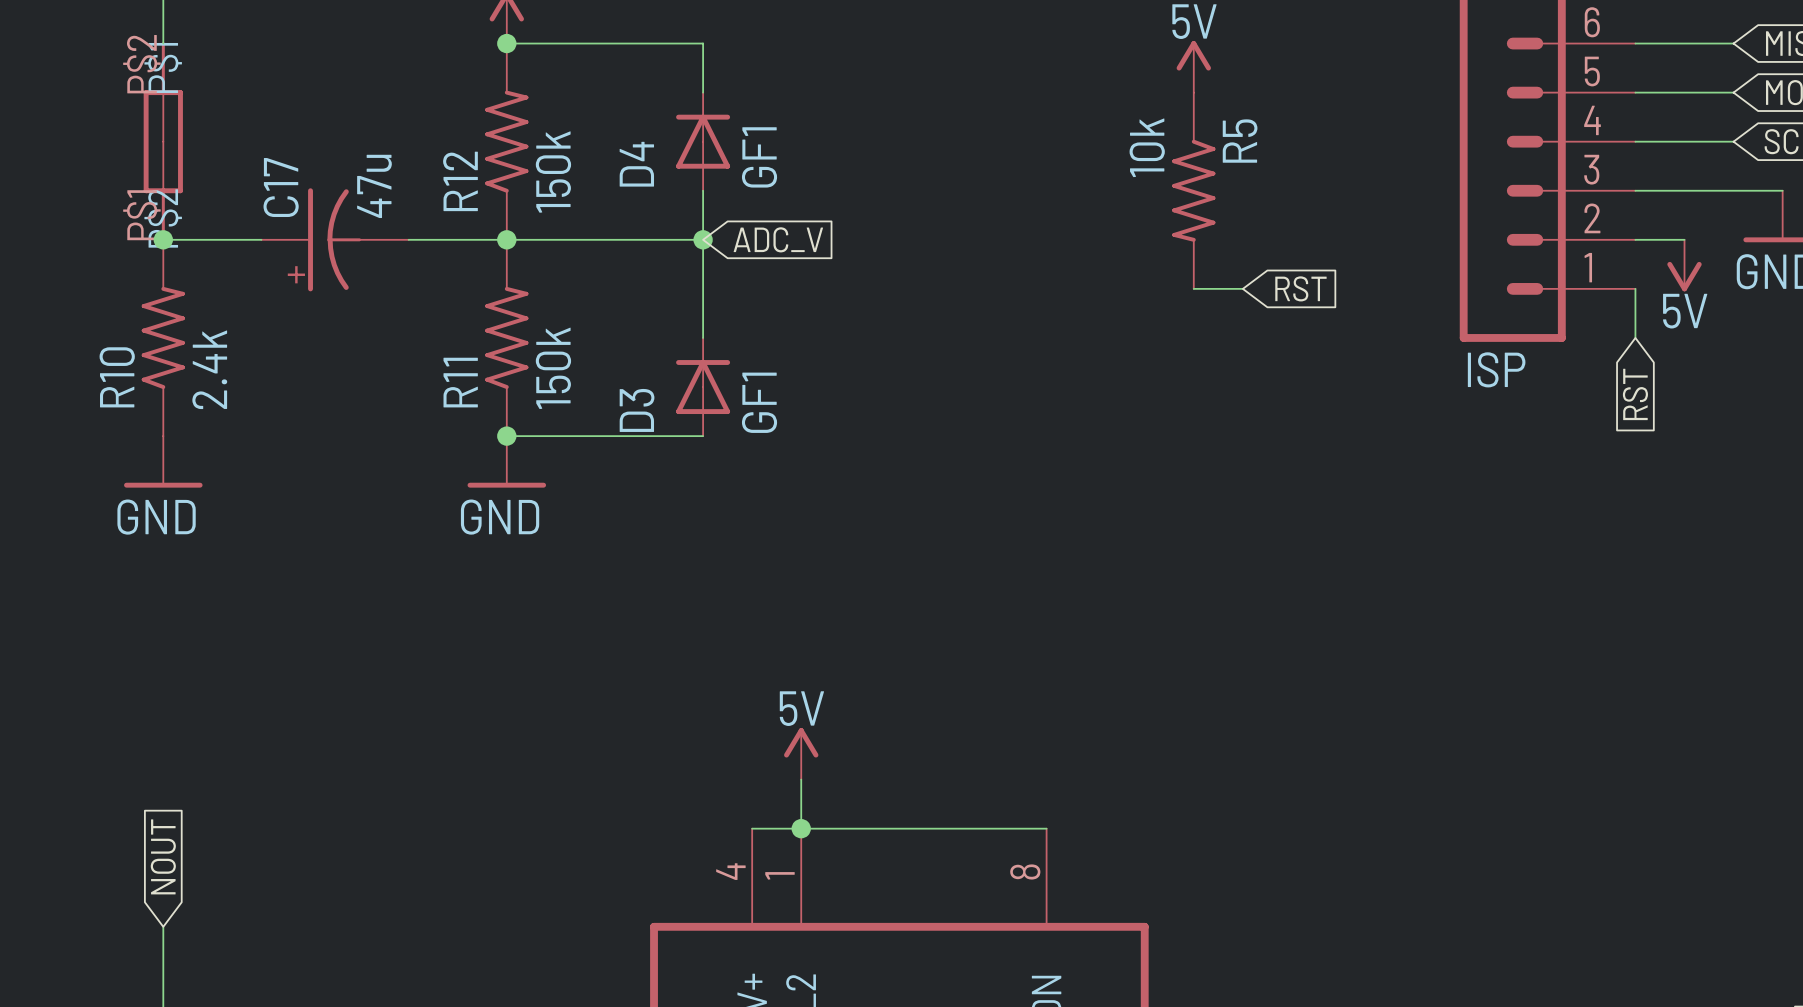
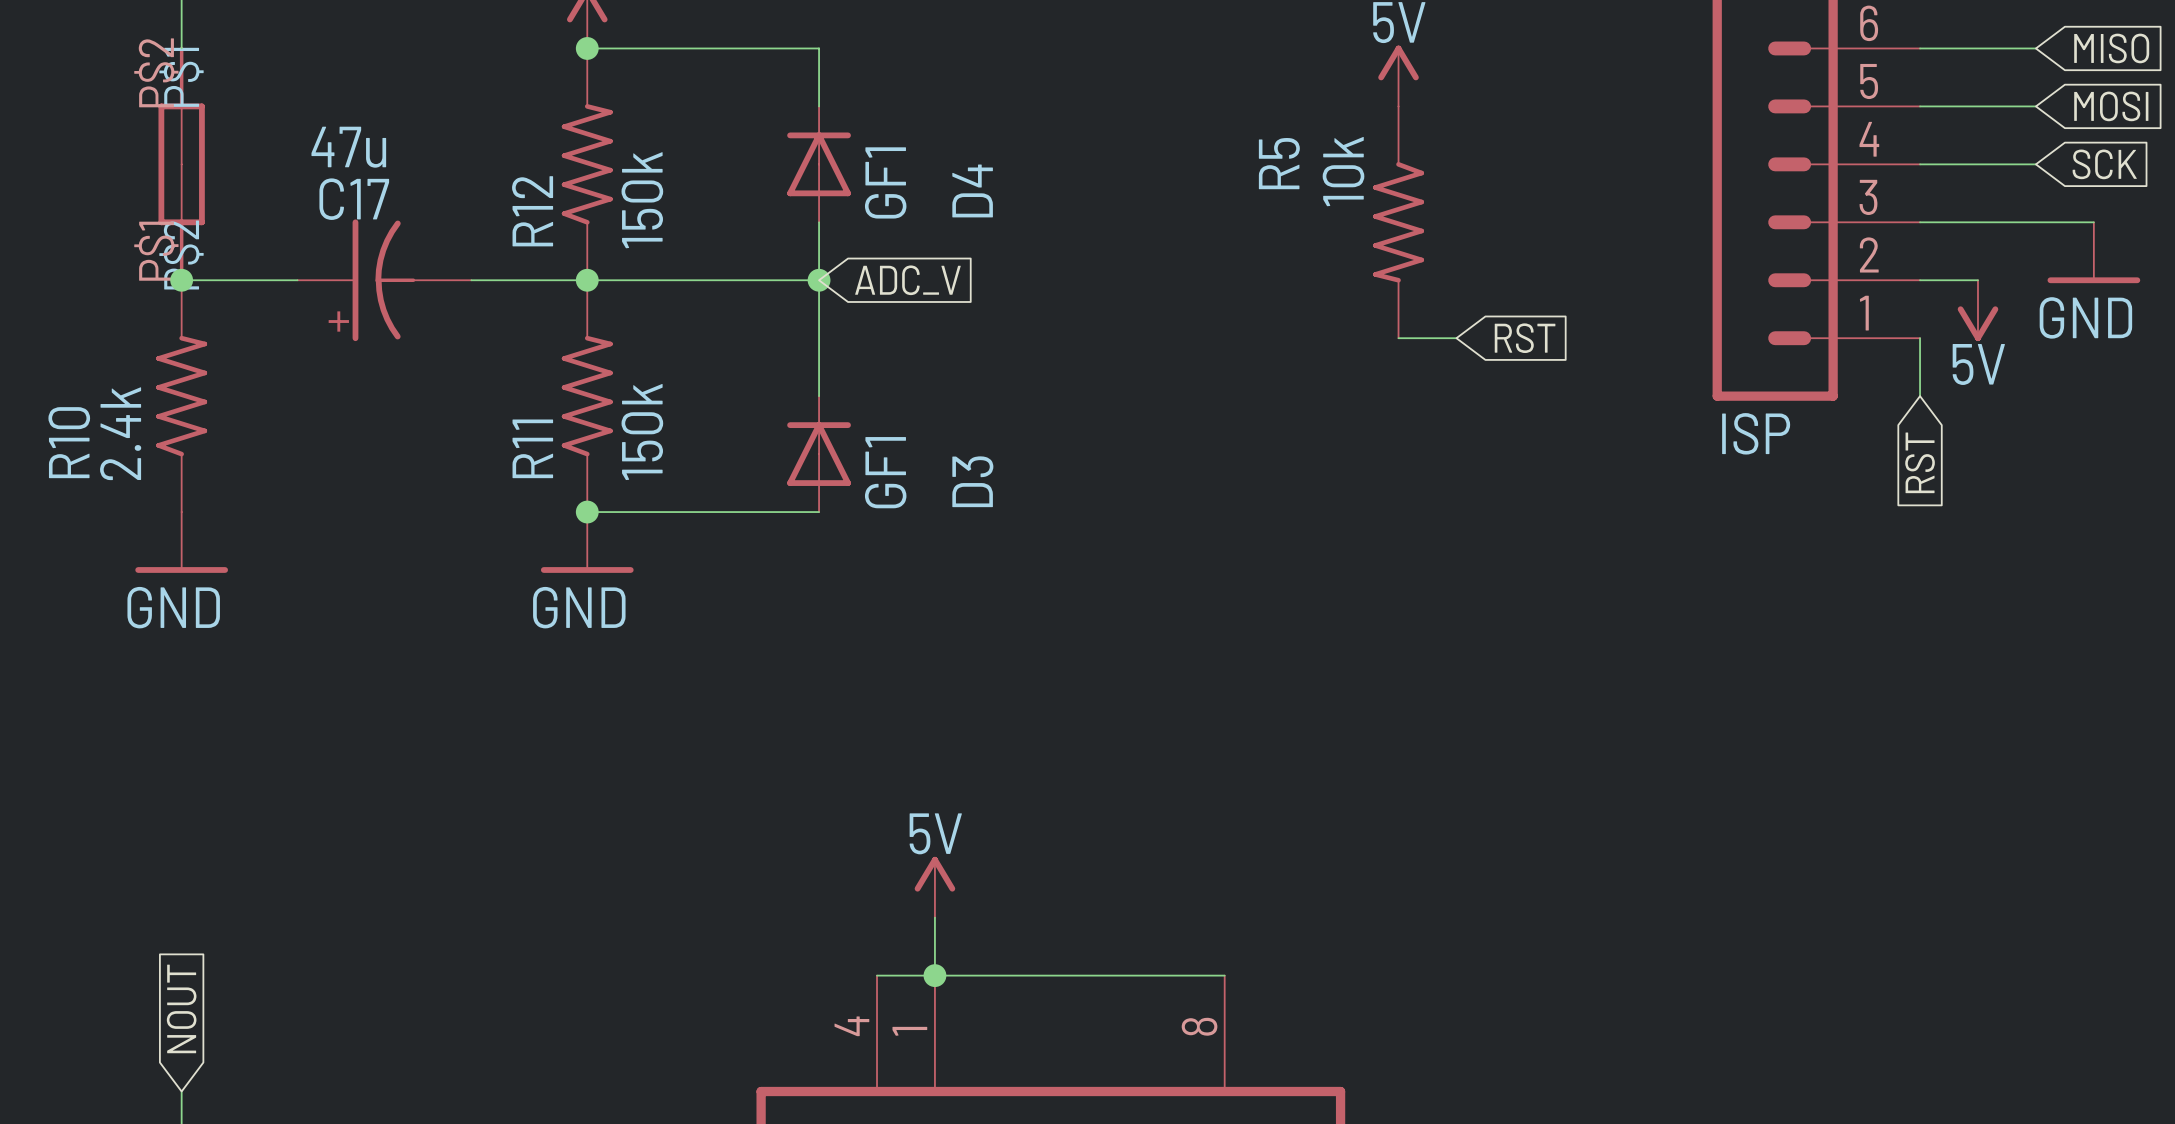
R5 name position: R5 (1240, 141) -> R5 (1279, 163)
D4 name position: D4 (636, 164) -> D4 (972, 190)
C17 value rotation: 0° (374, 186) -> 90° clockwise (348, 147)
C17 name rotation: 0° (281, 187) -> 90° clockwise (354, 199)
R10 value position: 2.4k (209, 369) -> 2.4k (120, 433)
R10 name position: R10 (117, 377) -> R10 (69, 442)
D3 name position: D3 (637, 410) -> D3 (972, 481)

